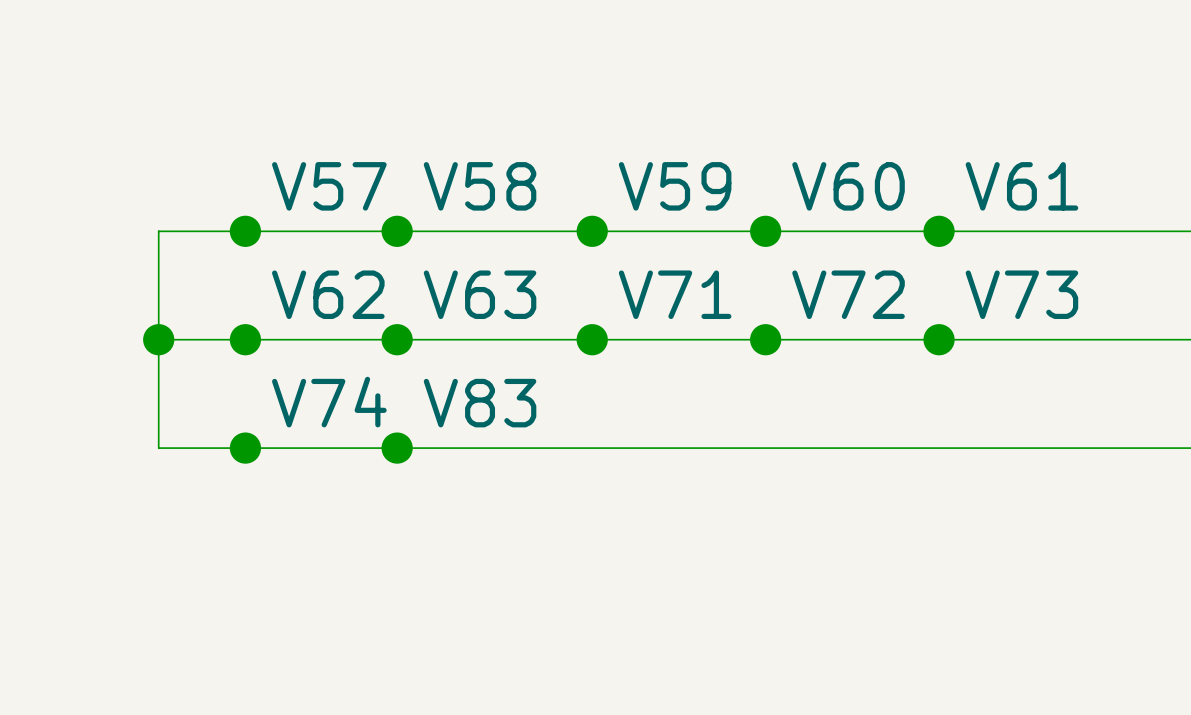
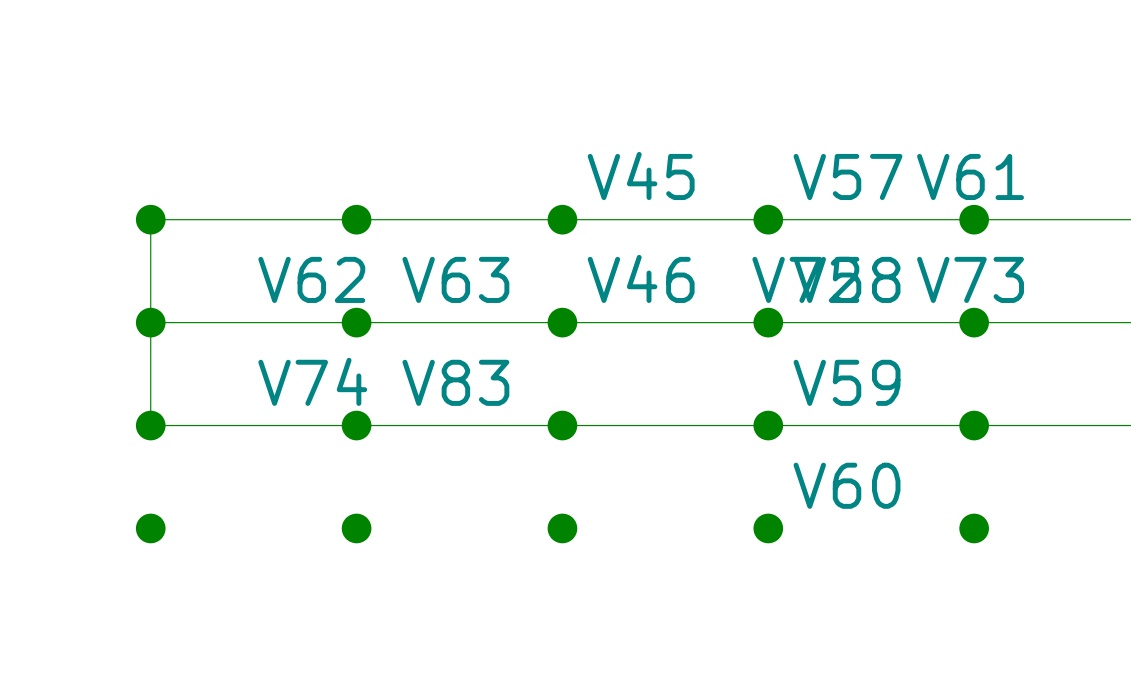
V57 position: (329, 186) -> (848, 176)
V58 position: (480, 186) -> (847, 279)
V59 name: V59 (675, 186) -> V45 (641, 176)
V60 position: (848, 186) -> (847, 485)
junction: none -> (150, 219)
junction: (245, 231) -> none
junction position: (397, 231) -> (356, 219)
junction position: (765, 231) -> (768, 219)
junction: (939, 231) -> none
junction: none -> (974, 219)
V71 name: V71 (675, 294) -> V46 (641, 278)
junction: (245, 339) -> none
junction position: (397, 339) -> (356, 322)
junction position: (765, 339) -> (768, 322)
junction: (939, 339) -> none
junction: none -> (974, 322)
V59: none -> (847, 382)
junction: none -> (150, 425)
junction: (245, 448) -> none
junction position: (397, 448) -> (356, 425)
junction: none -> (562, 425)
junction: none -> (768, 425)
junction: none -> (974, 425)
junction: none -> (150, 528)
junction: none -> (356, 528)
junction: none -> (562, 528)
junction: none -> (768, 528)
junction: none -> (974, 528)

